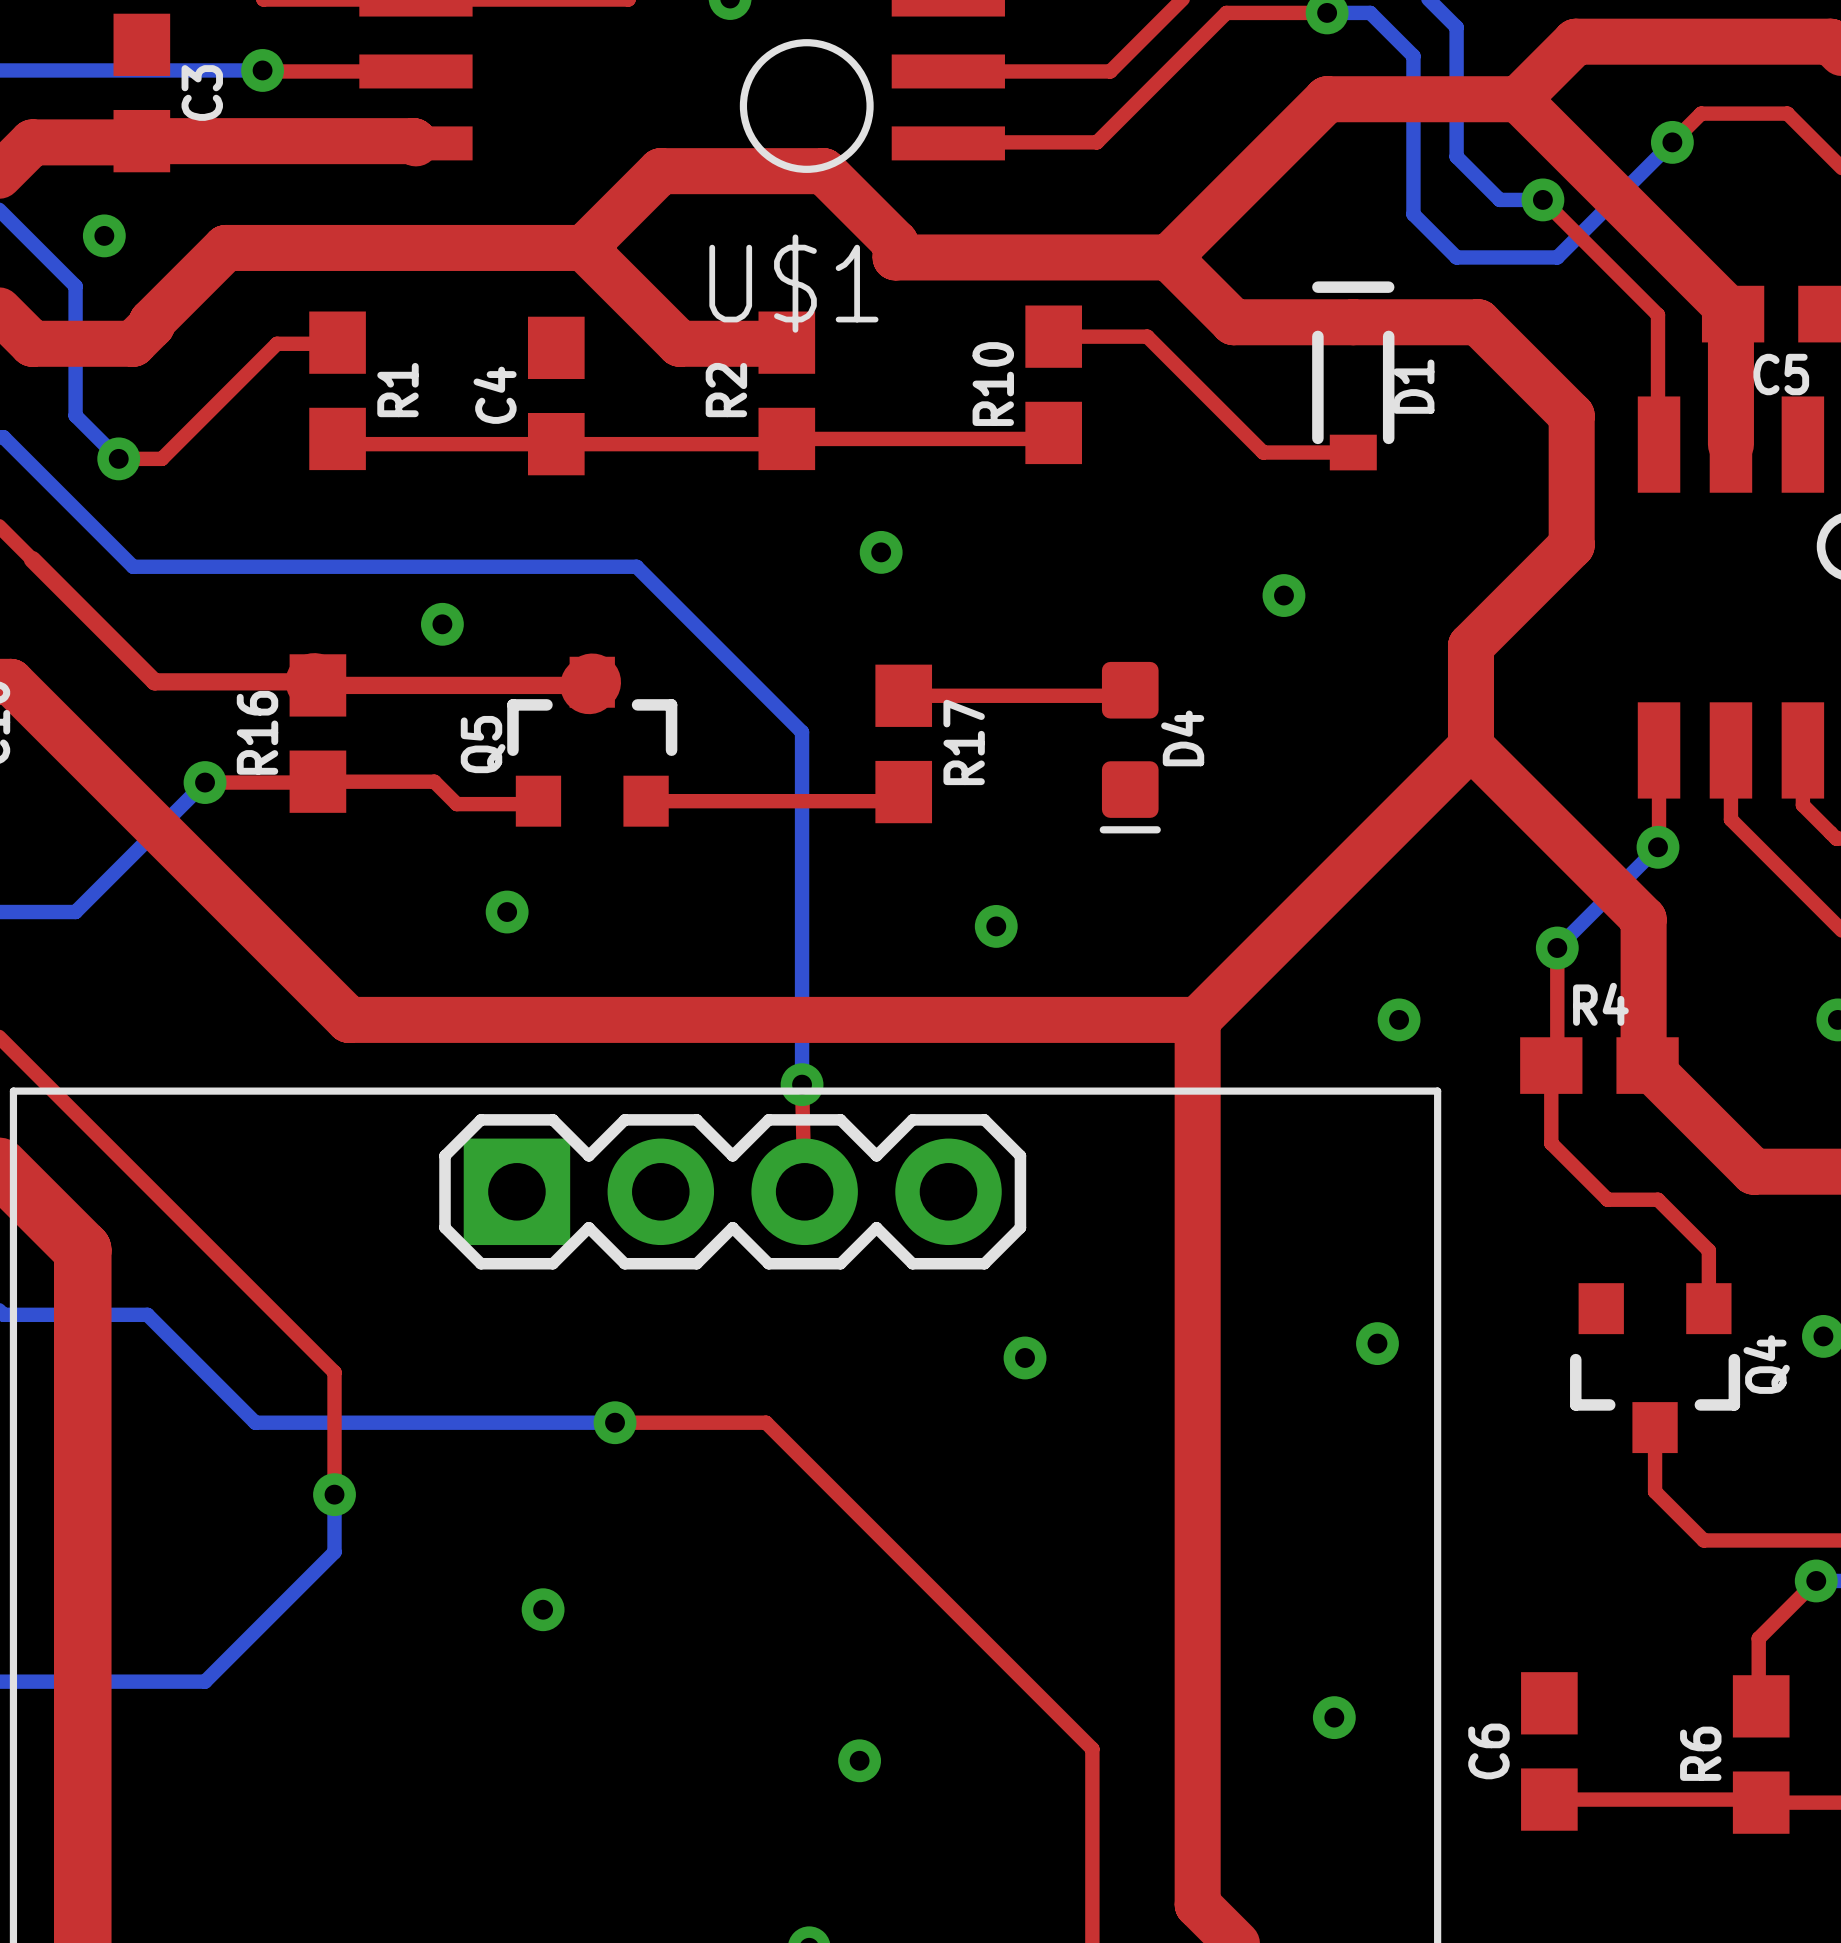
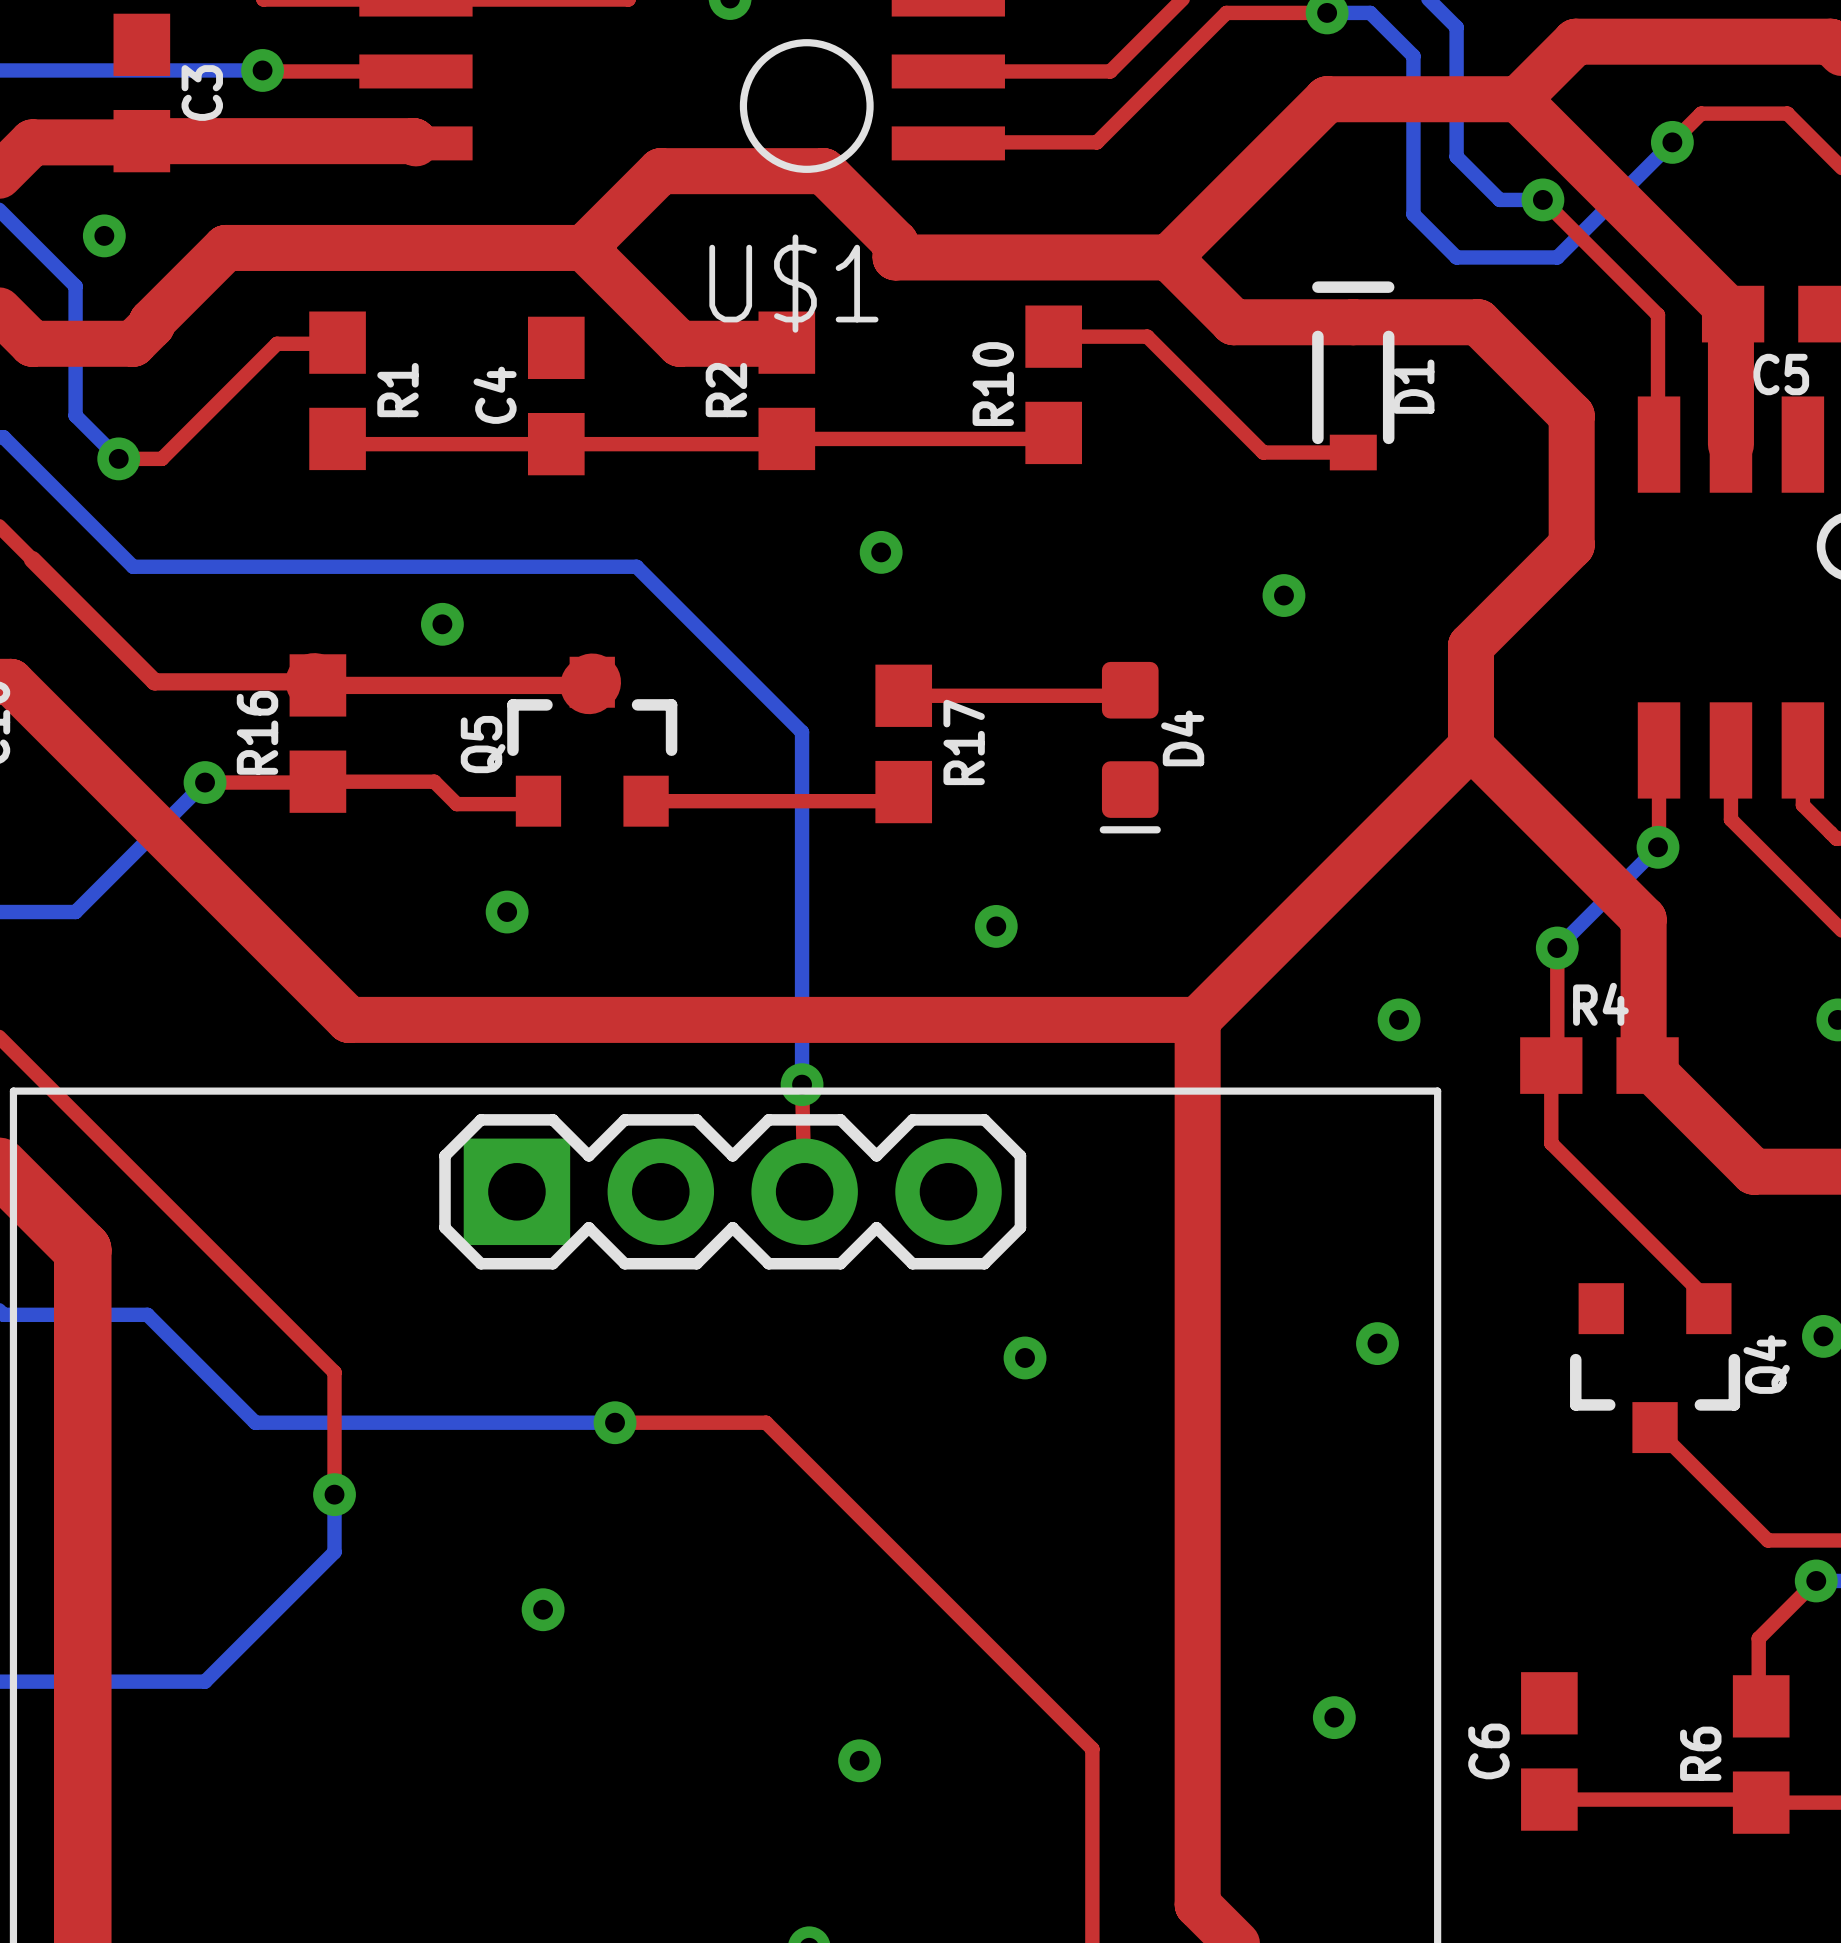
top track: (1607, 1199) (1658, 1199) (1708, 1250) (1708, 1300) -> (1607, 1199) (1708, 1300)
top track: (1655, 1427) (1655, 1491) (1703, 1540) (1767, 1540) -> (1655, 1427) (1767, 1540)

